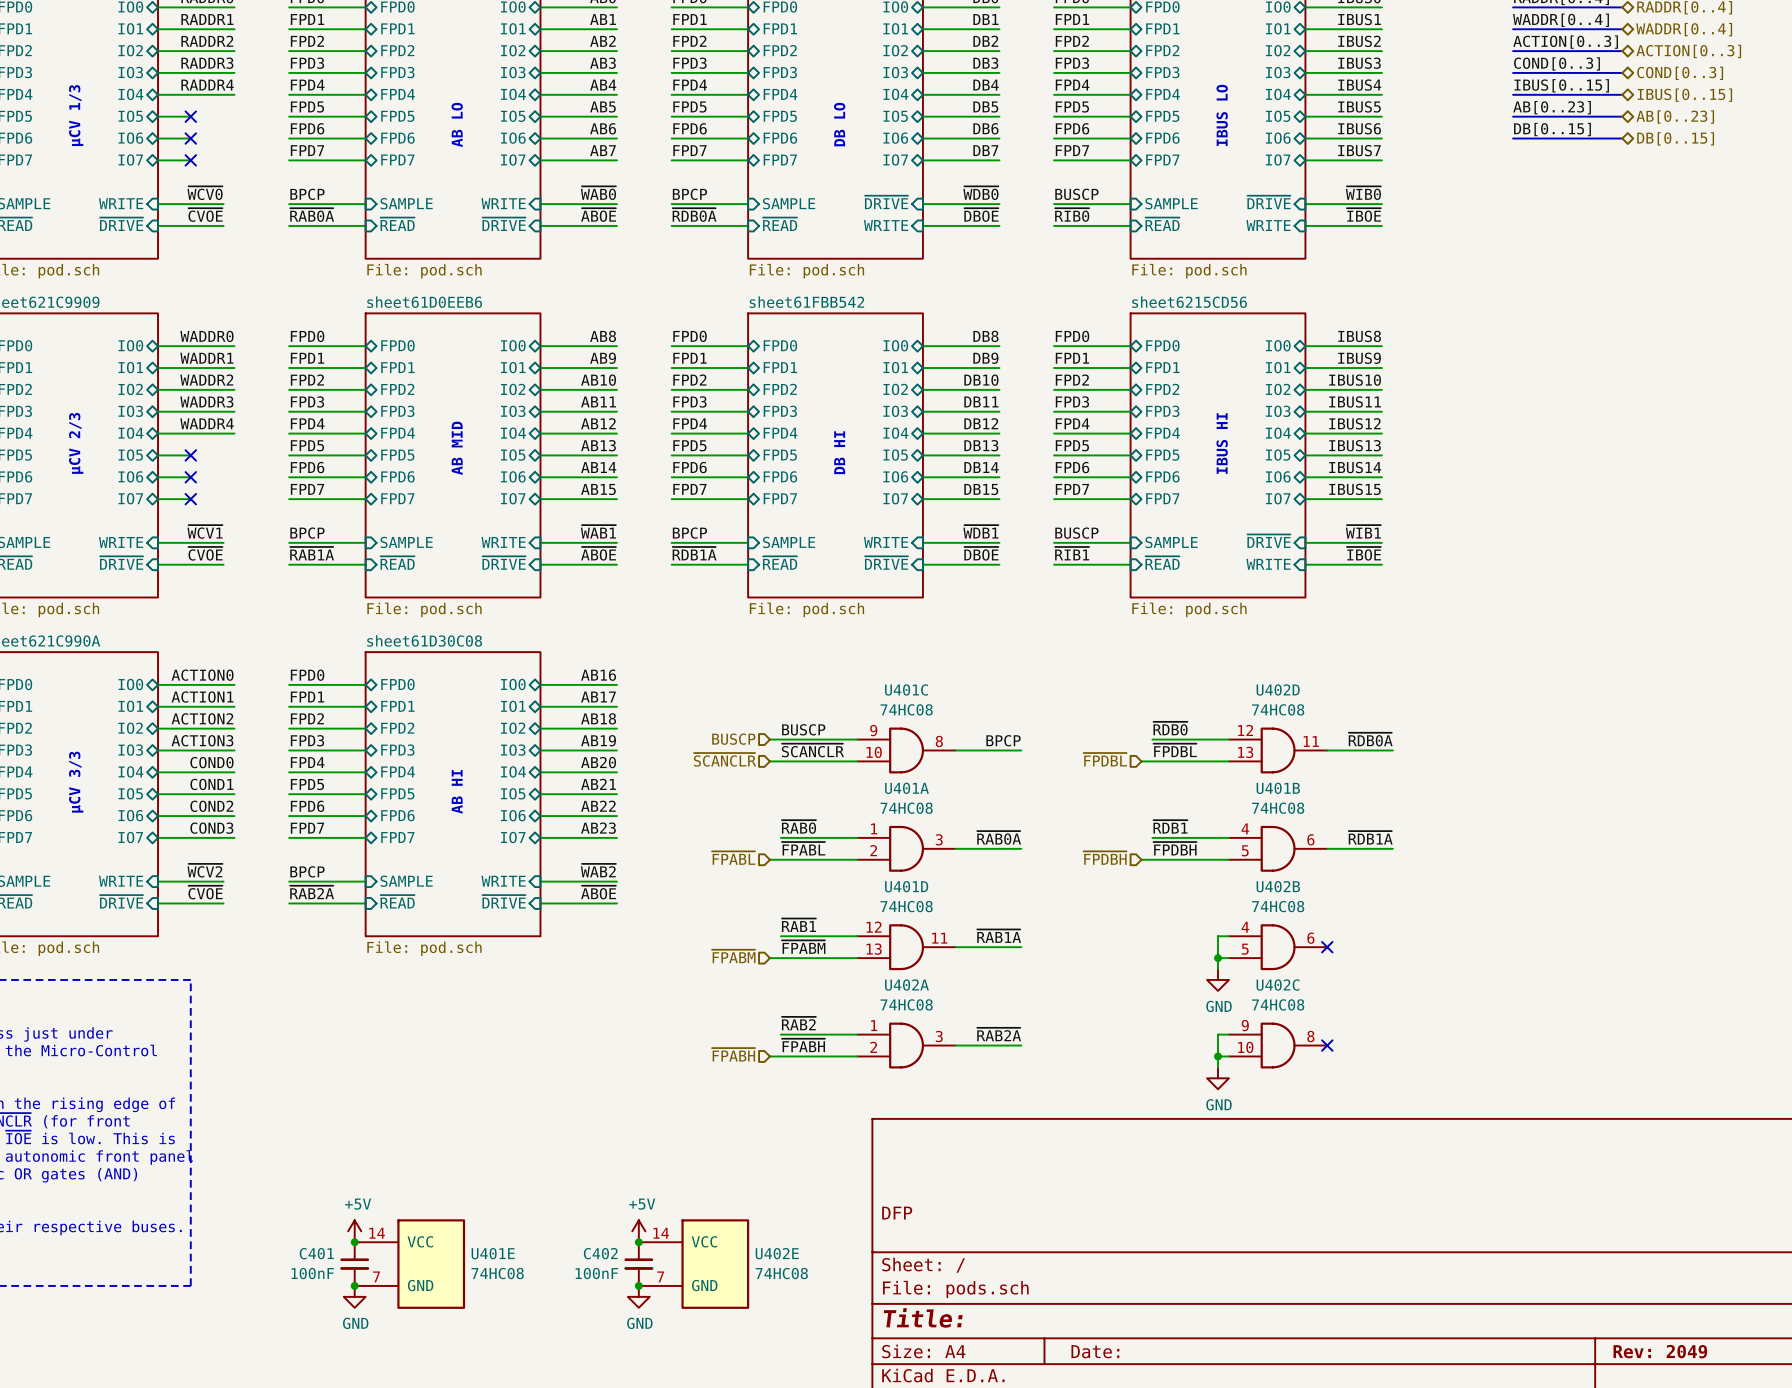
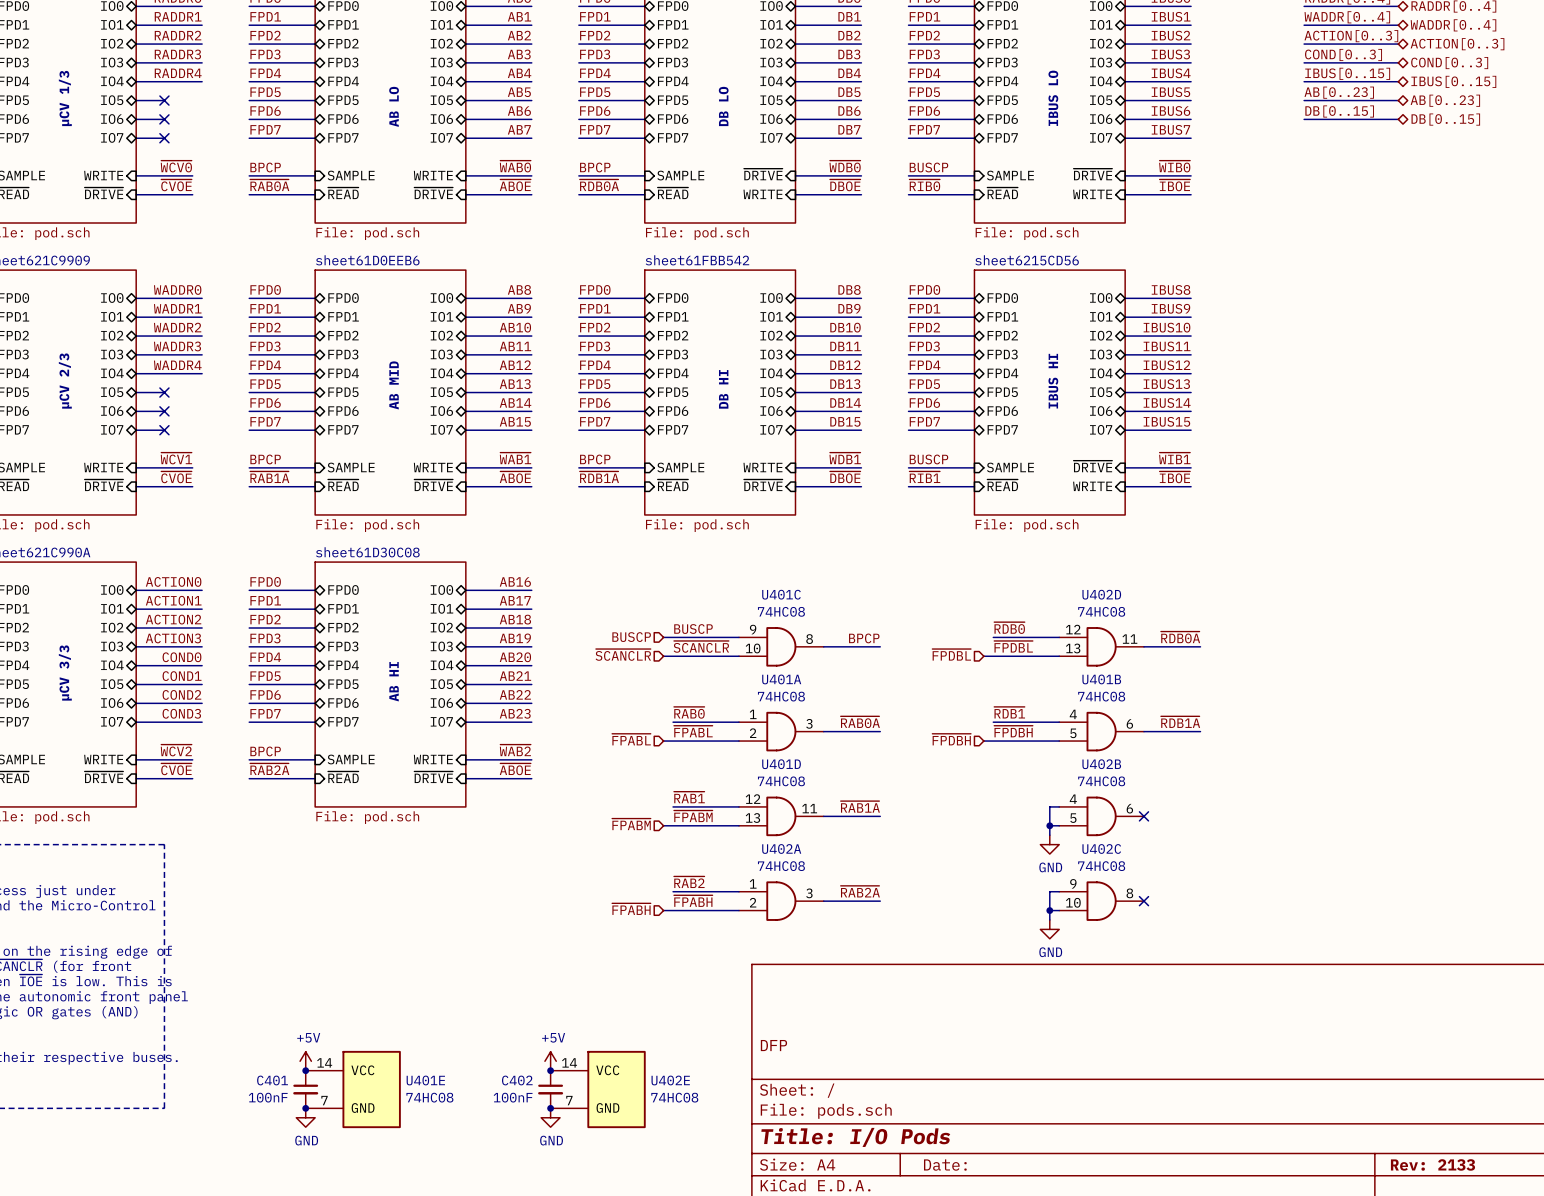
title block: Title: (923, 1317) -> Title: I/O Pods (855, 1137)
title block: Rev: 2049 (1660, 1351) -> Rev: 2133 (1432, 1164)

